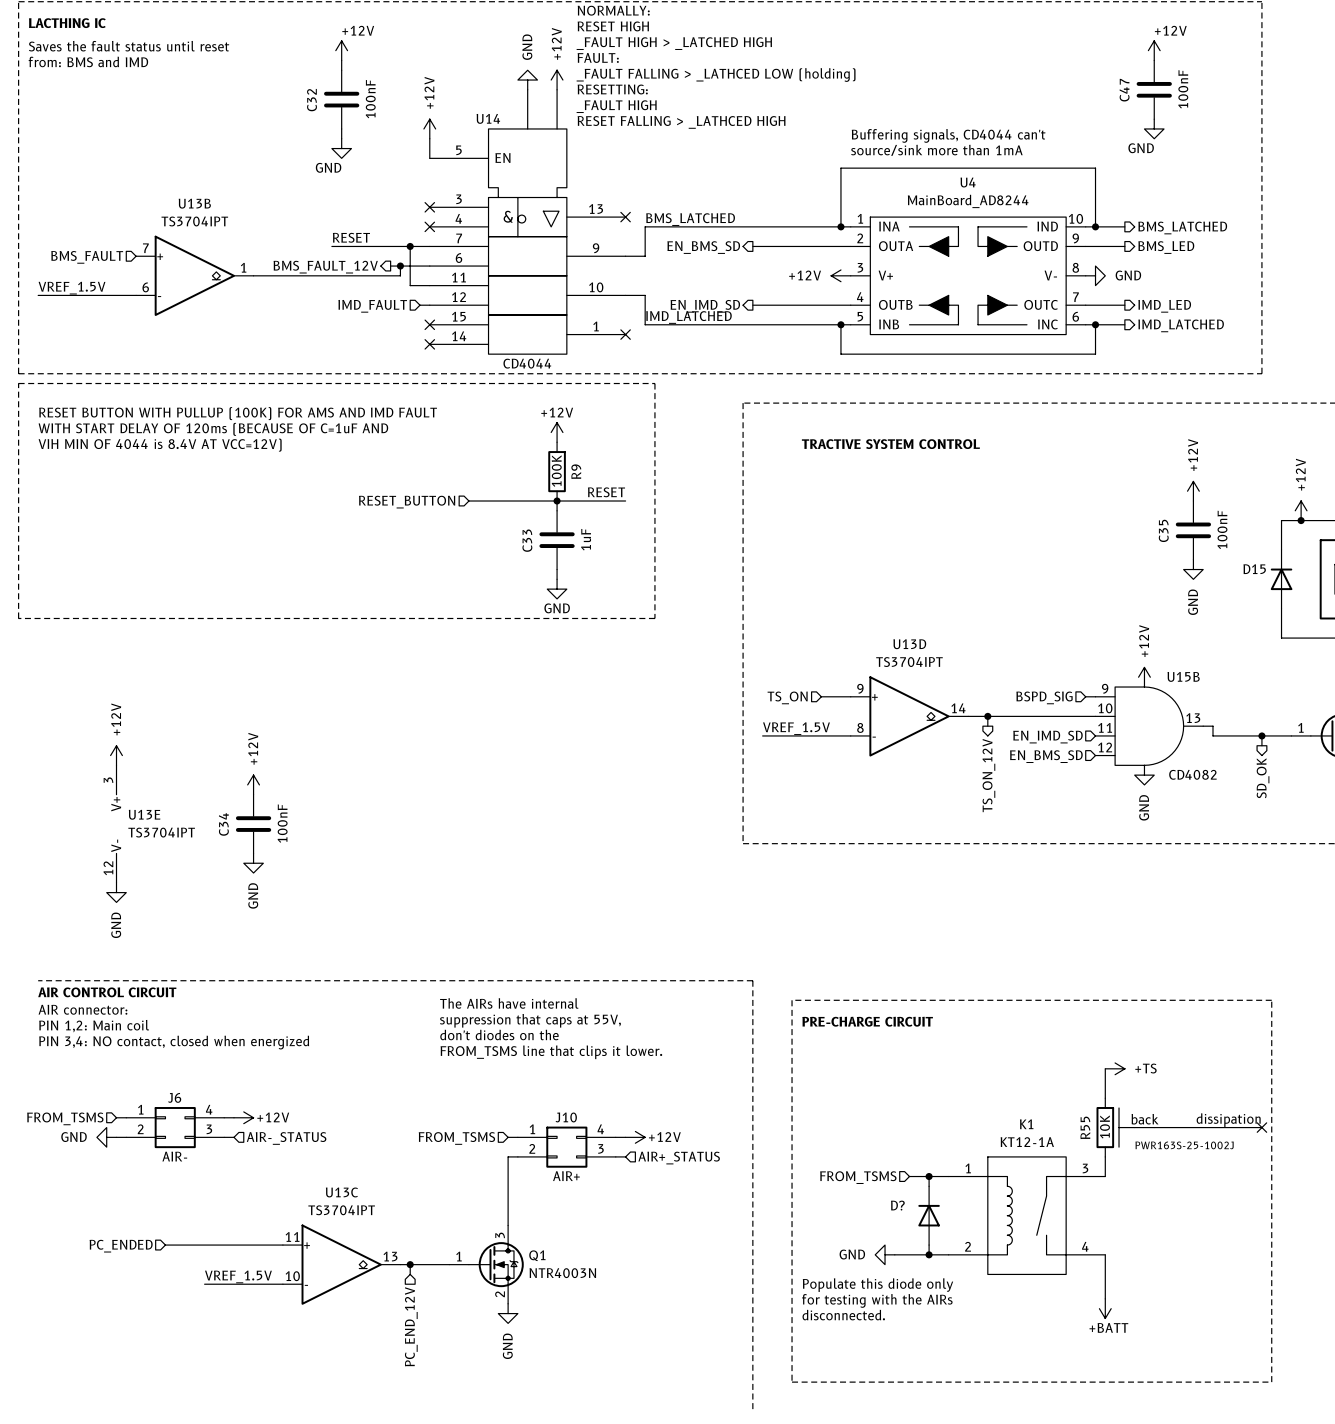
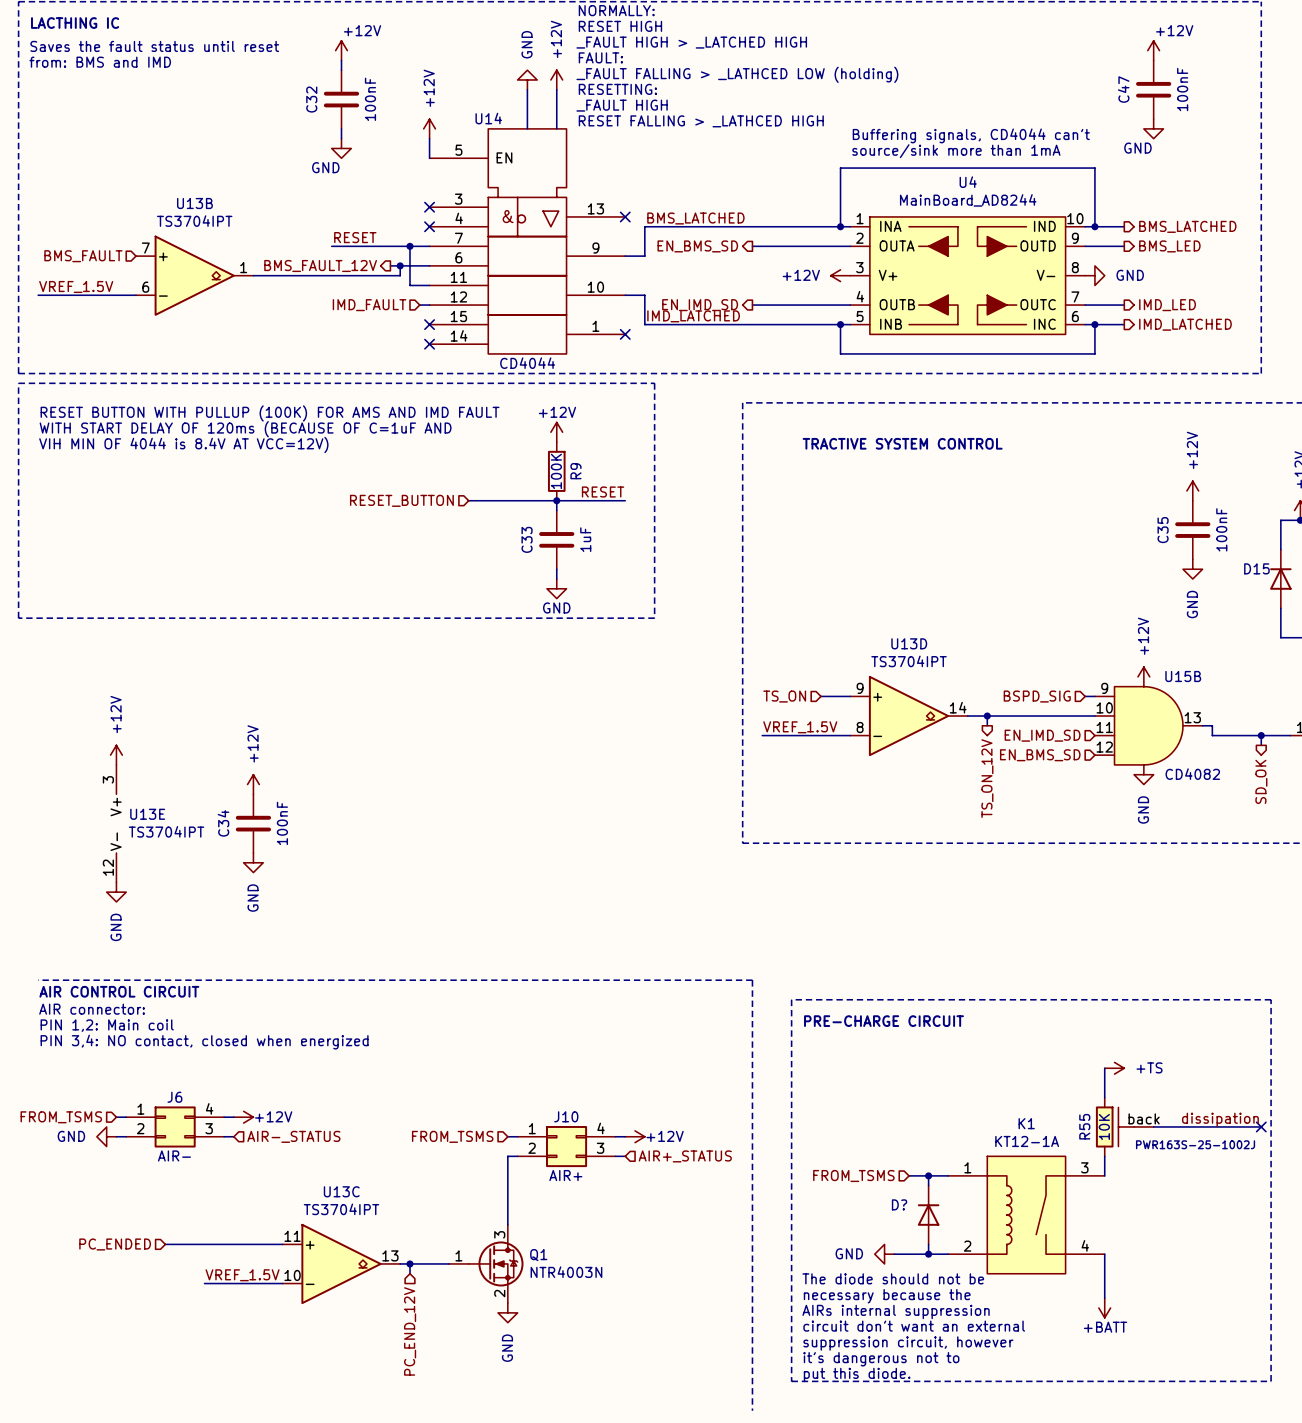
text: The AIRs have internal (509, 1003) -> none
text: suppression that caps at 55V, (530, 1020) -> none
text: don't diodes on the (499, 1034) -> none
text: FROM_TSMS line that clips it lower. (551, 1052) -> none
text: Populate this diode only (877, 1285) -> The diode should not be (893, 1278)
text: for testing with the AIRs (877, 1300) -> necessary because the (887, 1296)
text: disconnected. (843, 1315) -> AIRs internal suppression (896, 1311)
text: none -> circuit don't want an external (914, 1326)
text: none -> suppression circuit, however (908, 1343)
text: none -> it's dangerous not to (881, 1359)
text: none -> put this diode. (857, 1375)

